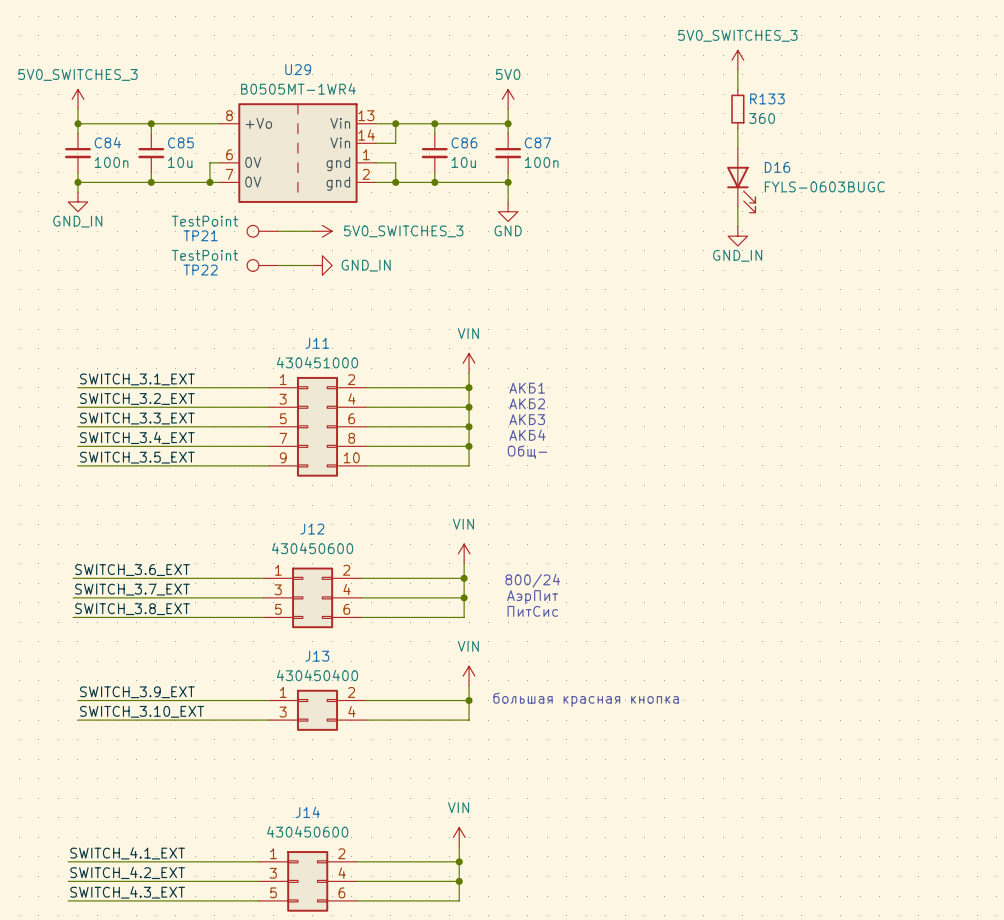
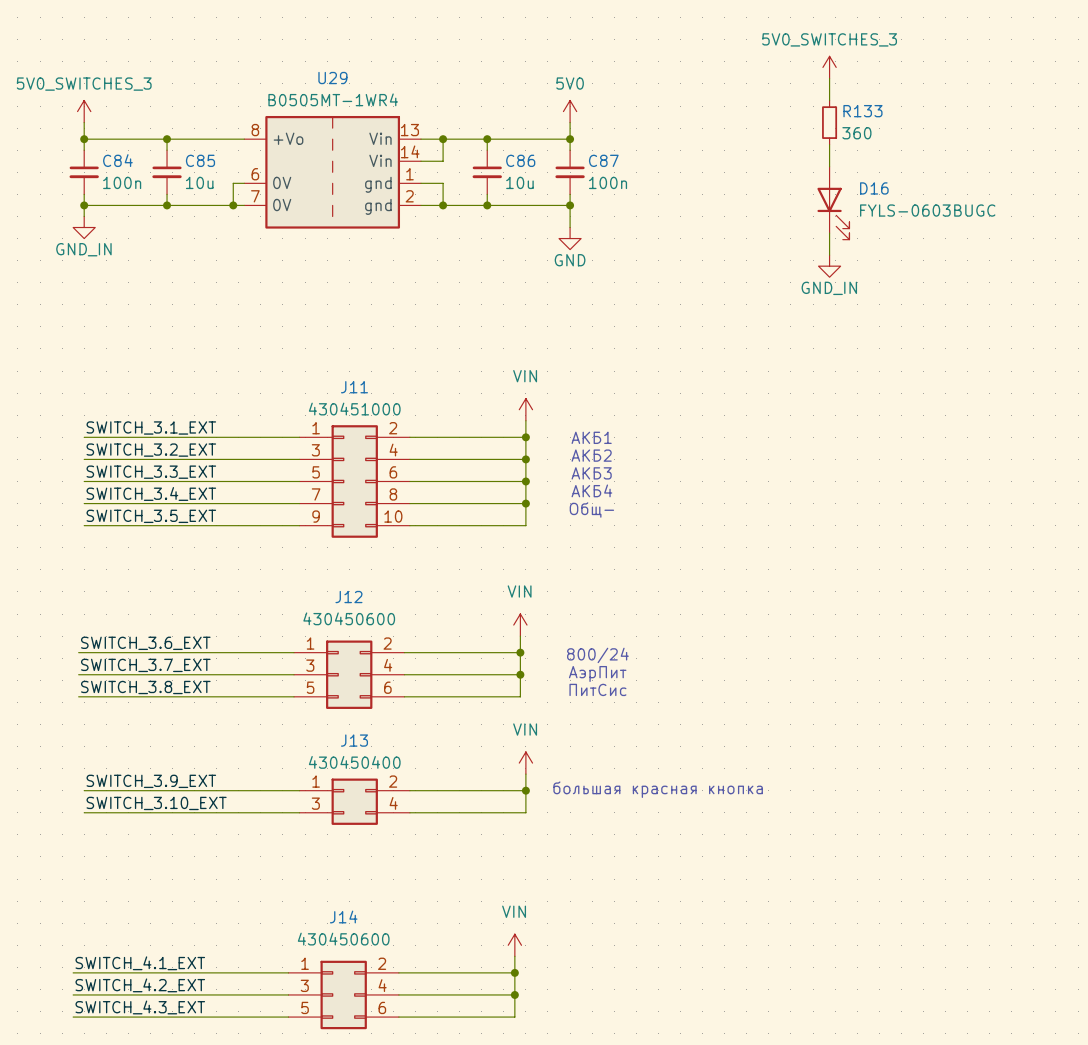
TP21: TestPoint (262, 231) -> none
wire: (278, 231) (312, 231) -> none
power symbol: 5V0_SWITCHES_3 (322, 231) -> none
TP22: TestPoint (262, 265) -> none
wire: (278, 265) (312, 265) -> none
power symbol: GND_IN (322, 265) -> none

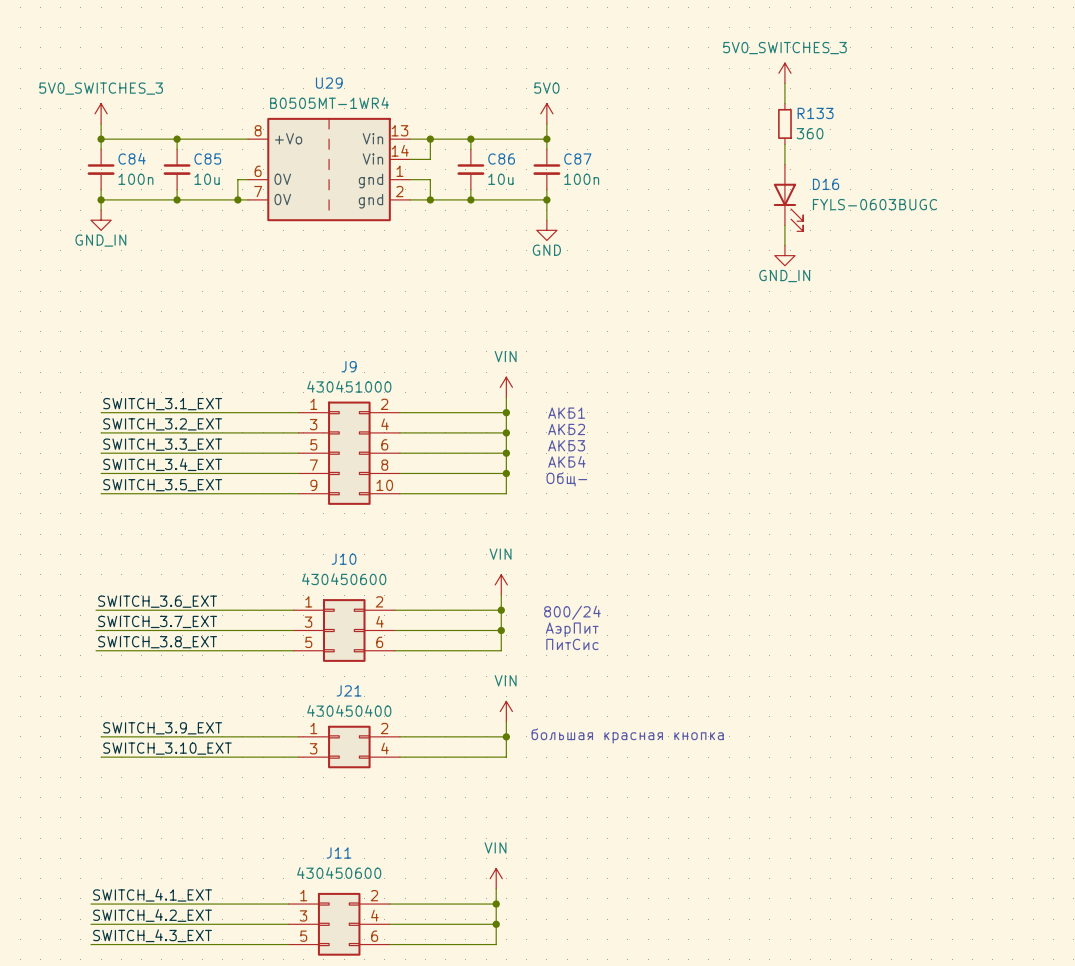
J11 name: J11 (354, 387) -> J9 (349, 366)
J12 name: J12 (348, 597) -> J10 (344, 559)
J13 name: J13 (354, 740) -> J21 (349, 690)
J14 name: J14 (343, 917) -> J11 (338, 853)

